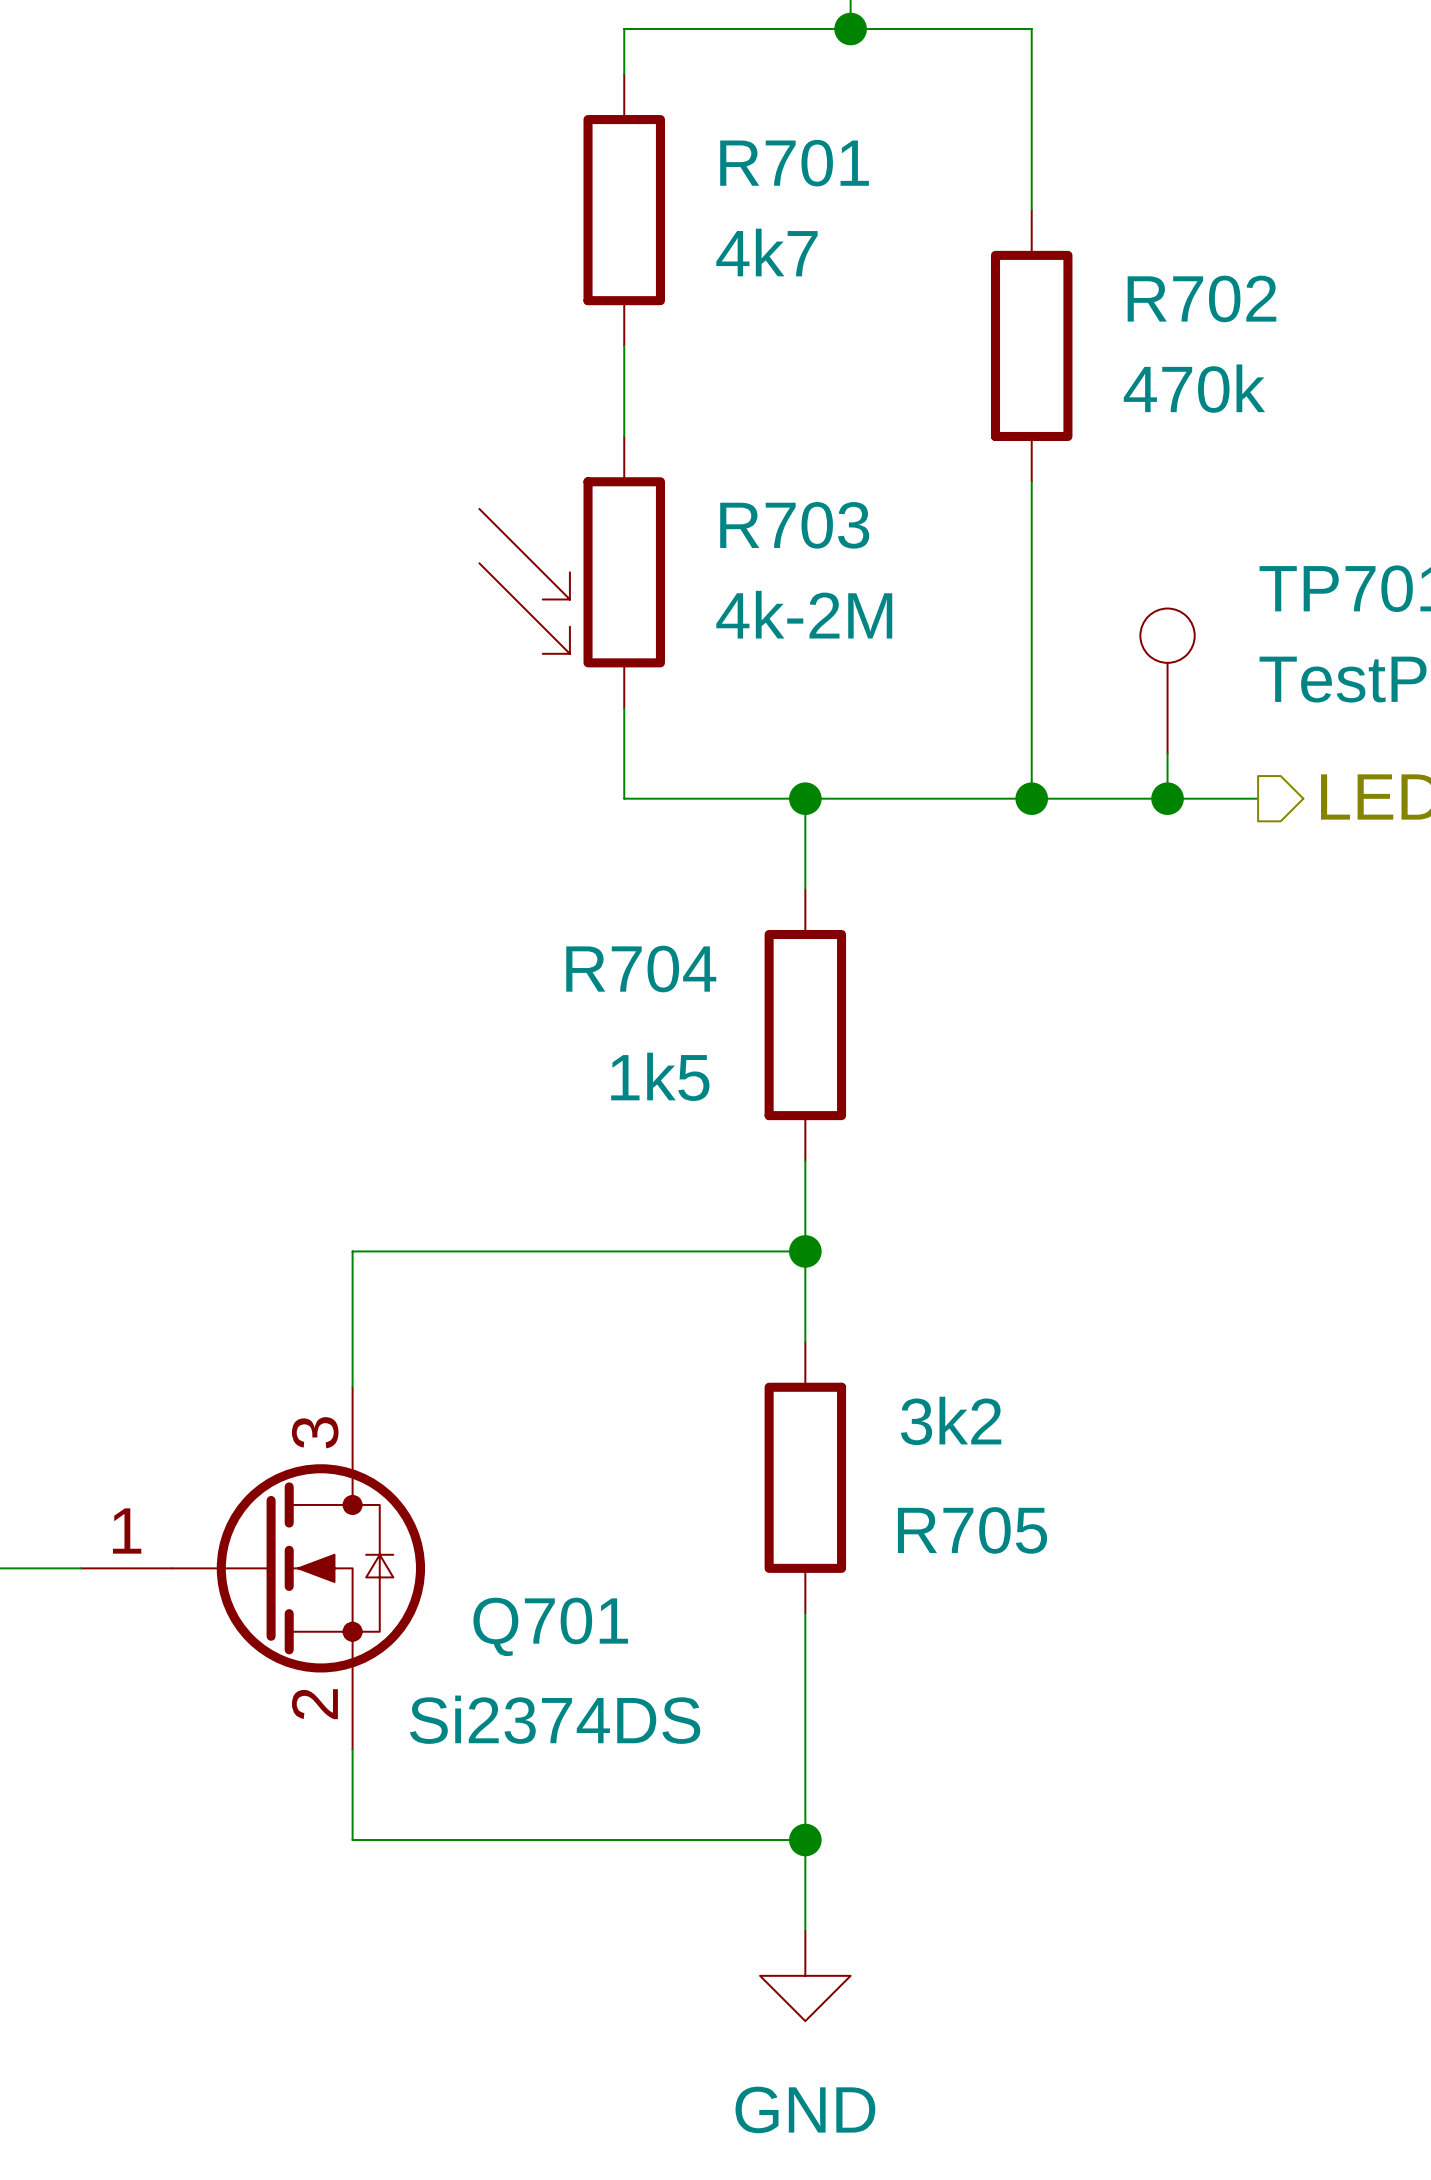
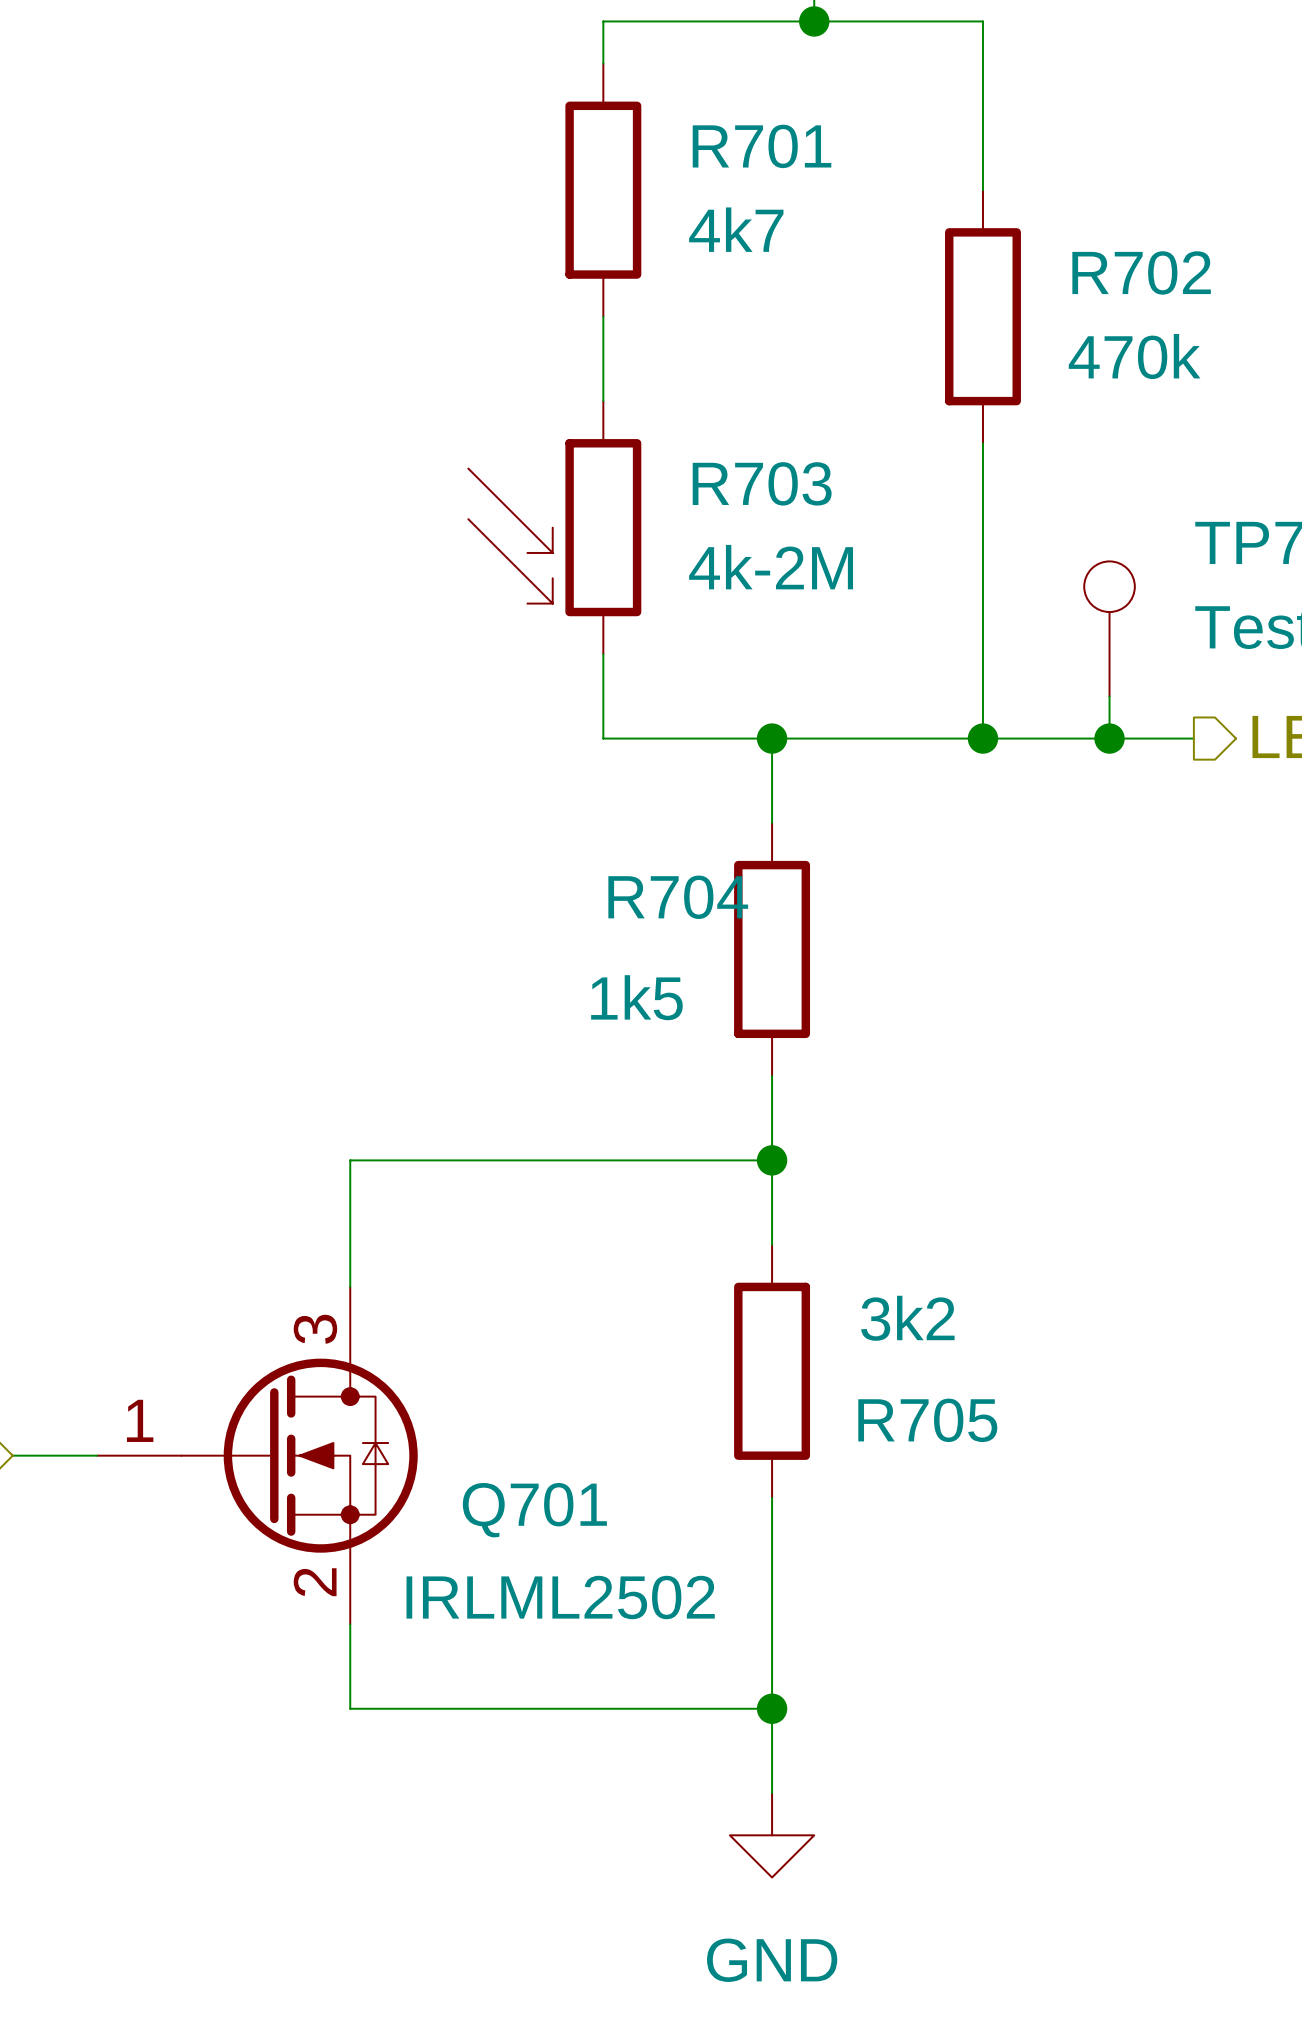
R704 name position: R704 (641, 969) -> R704 (678, 897)
Q701 value: Si2374DS (555, 1719) -> IRLML2502 (560, 1597)

